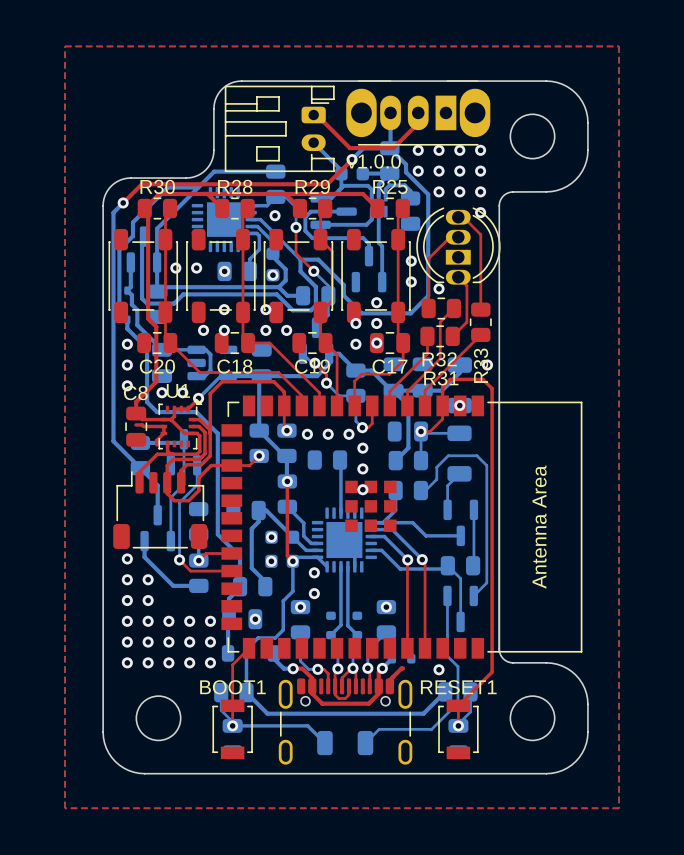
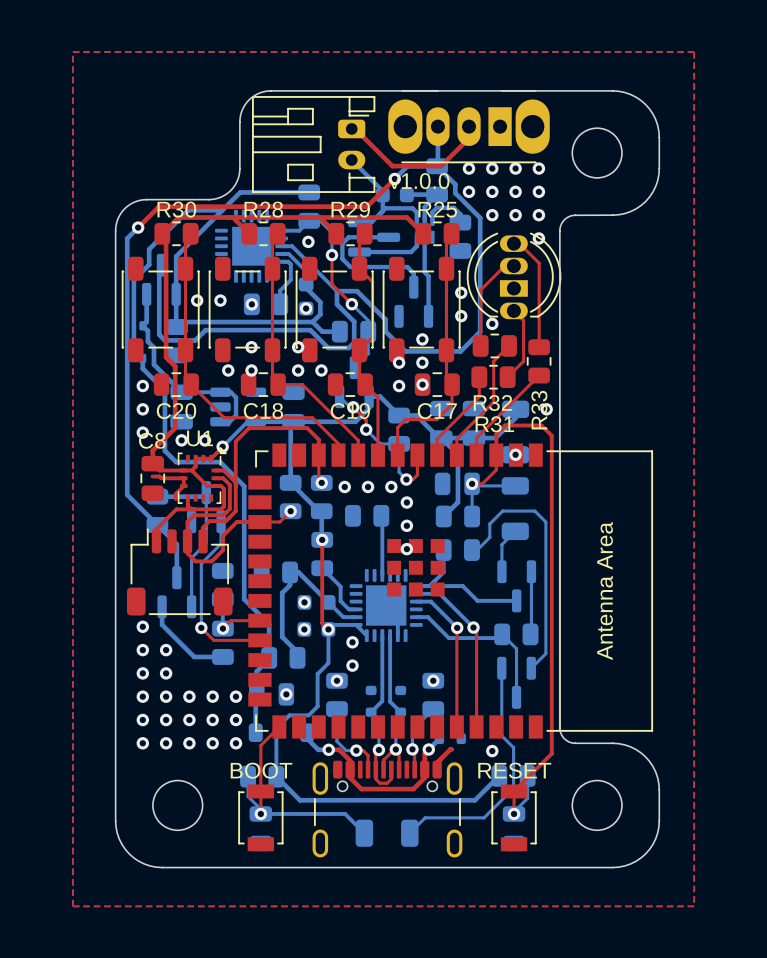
BOOT1 name: BOOT1 (232, 687) -> BOOT (261, 770)
RESET1 name: RESET1 (458, 687) -> RESET (514, 770)

